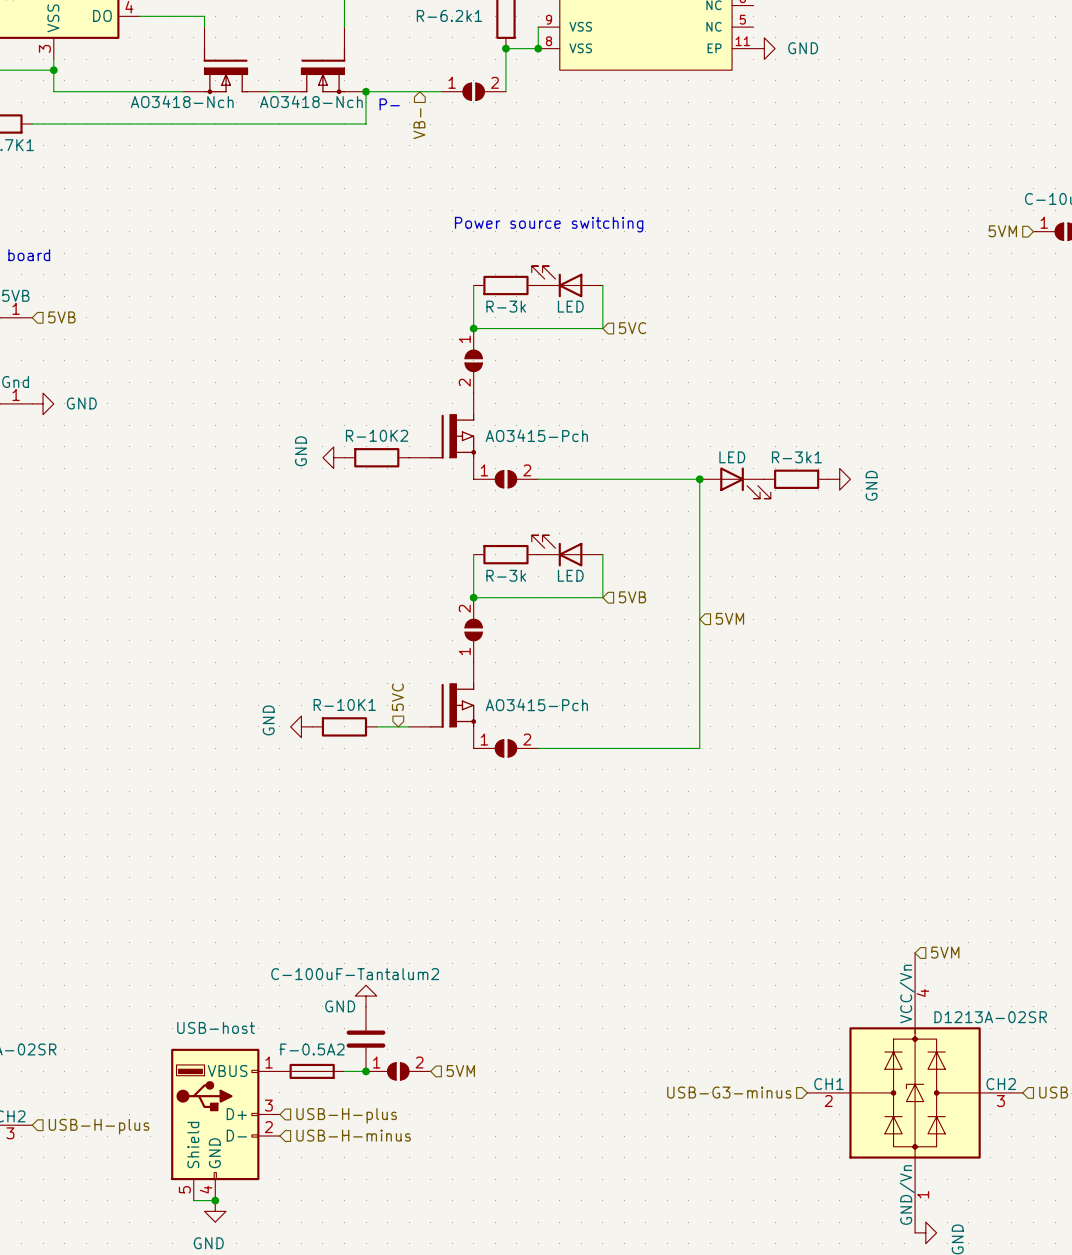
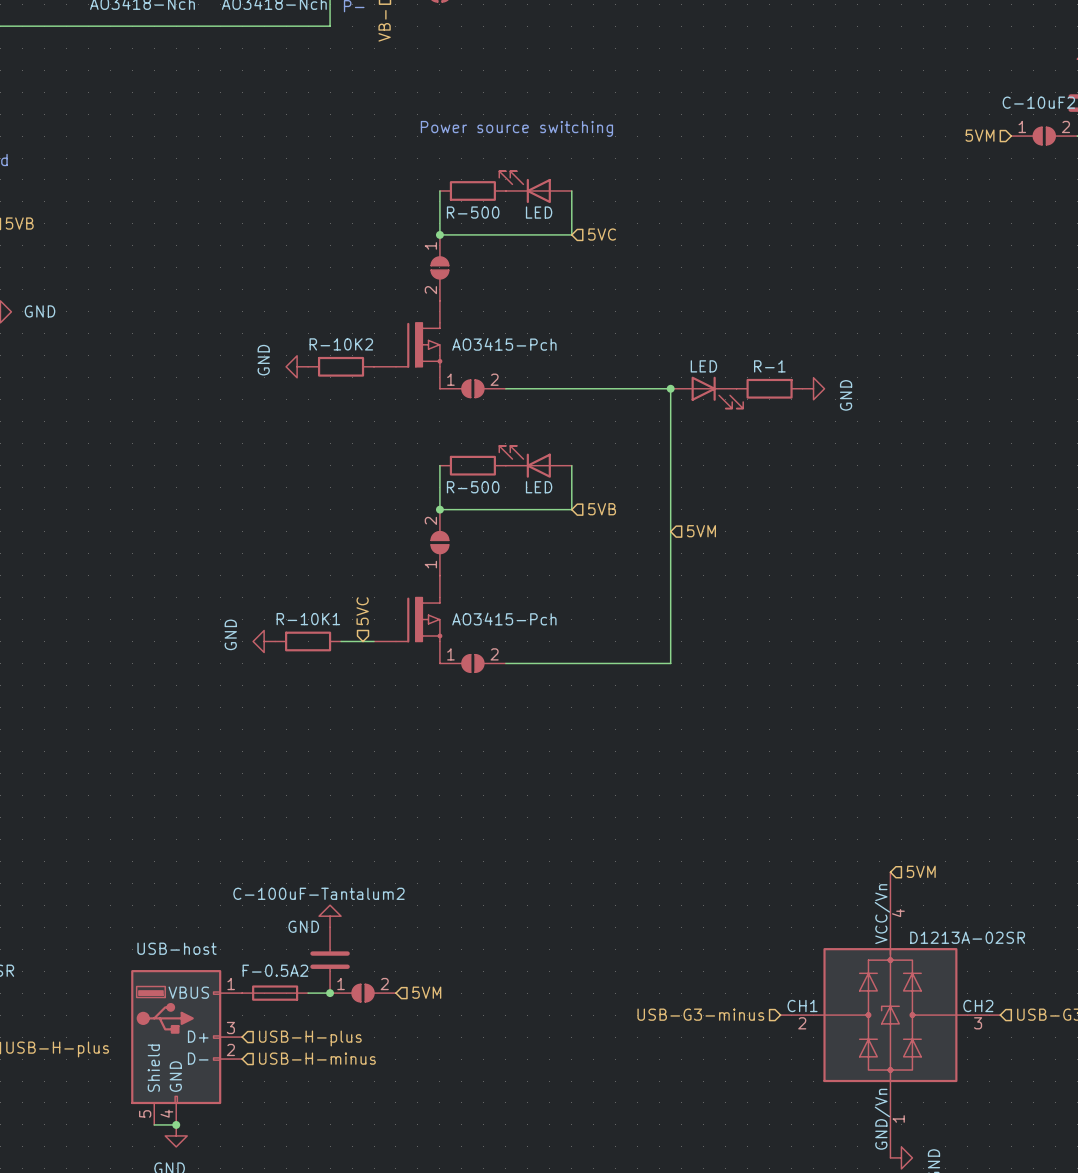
part value: R-3k (506, 306) -> R-500 (473, 212)
R-3k1 name: R-3k1 (796, 457) -> R-1 (769, 366)
part value: R-3k (506, 575) -> R-500 (473, 487)

